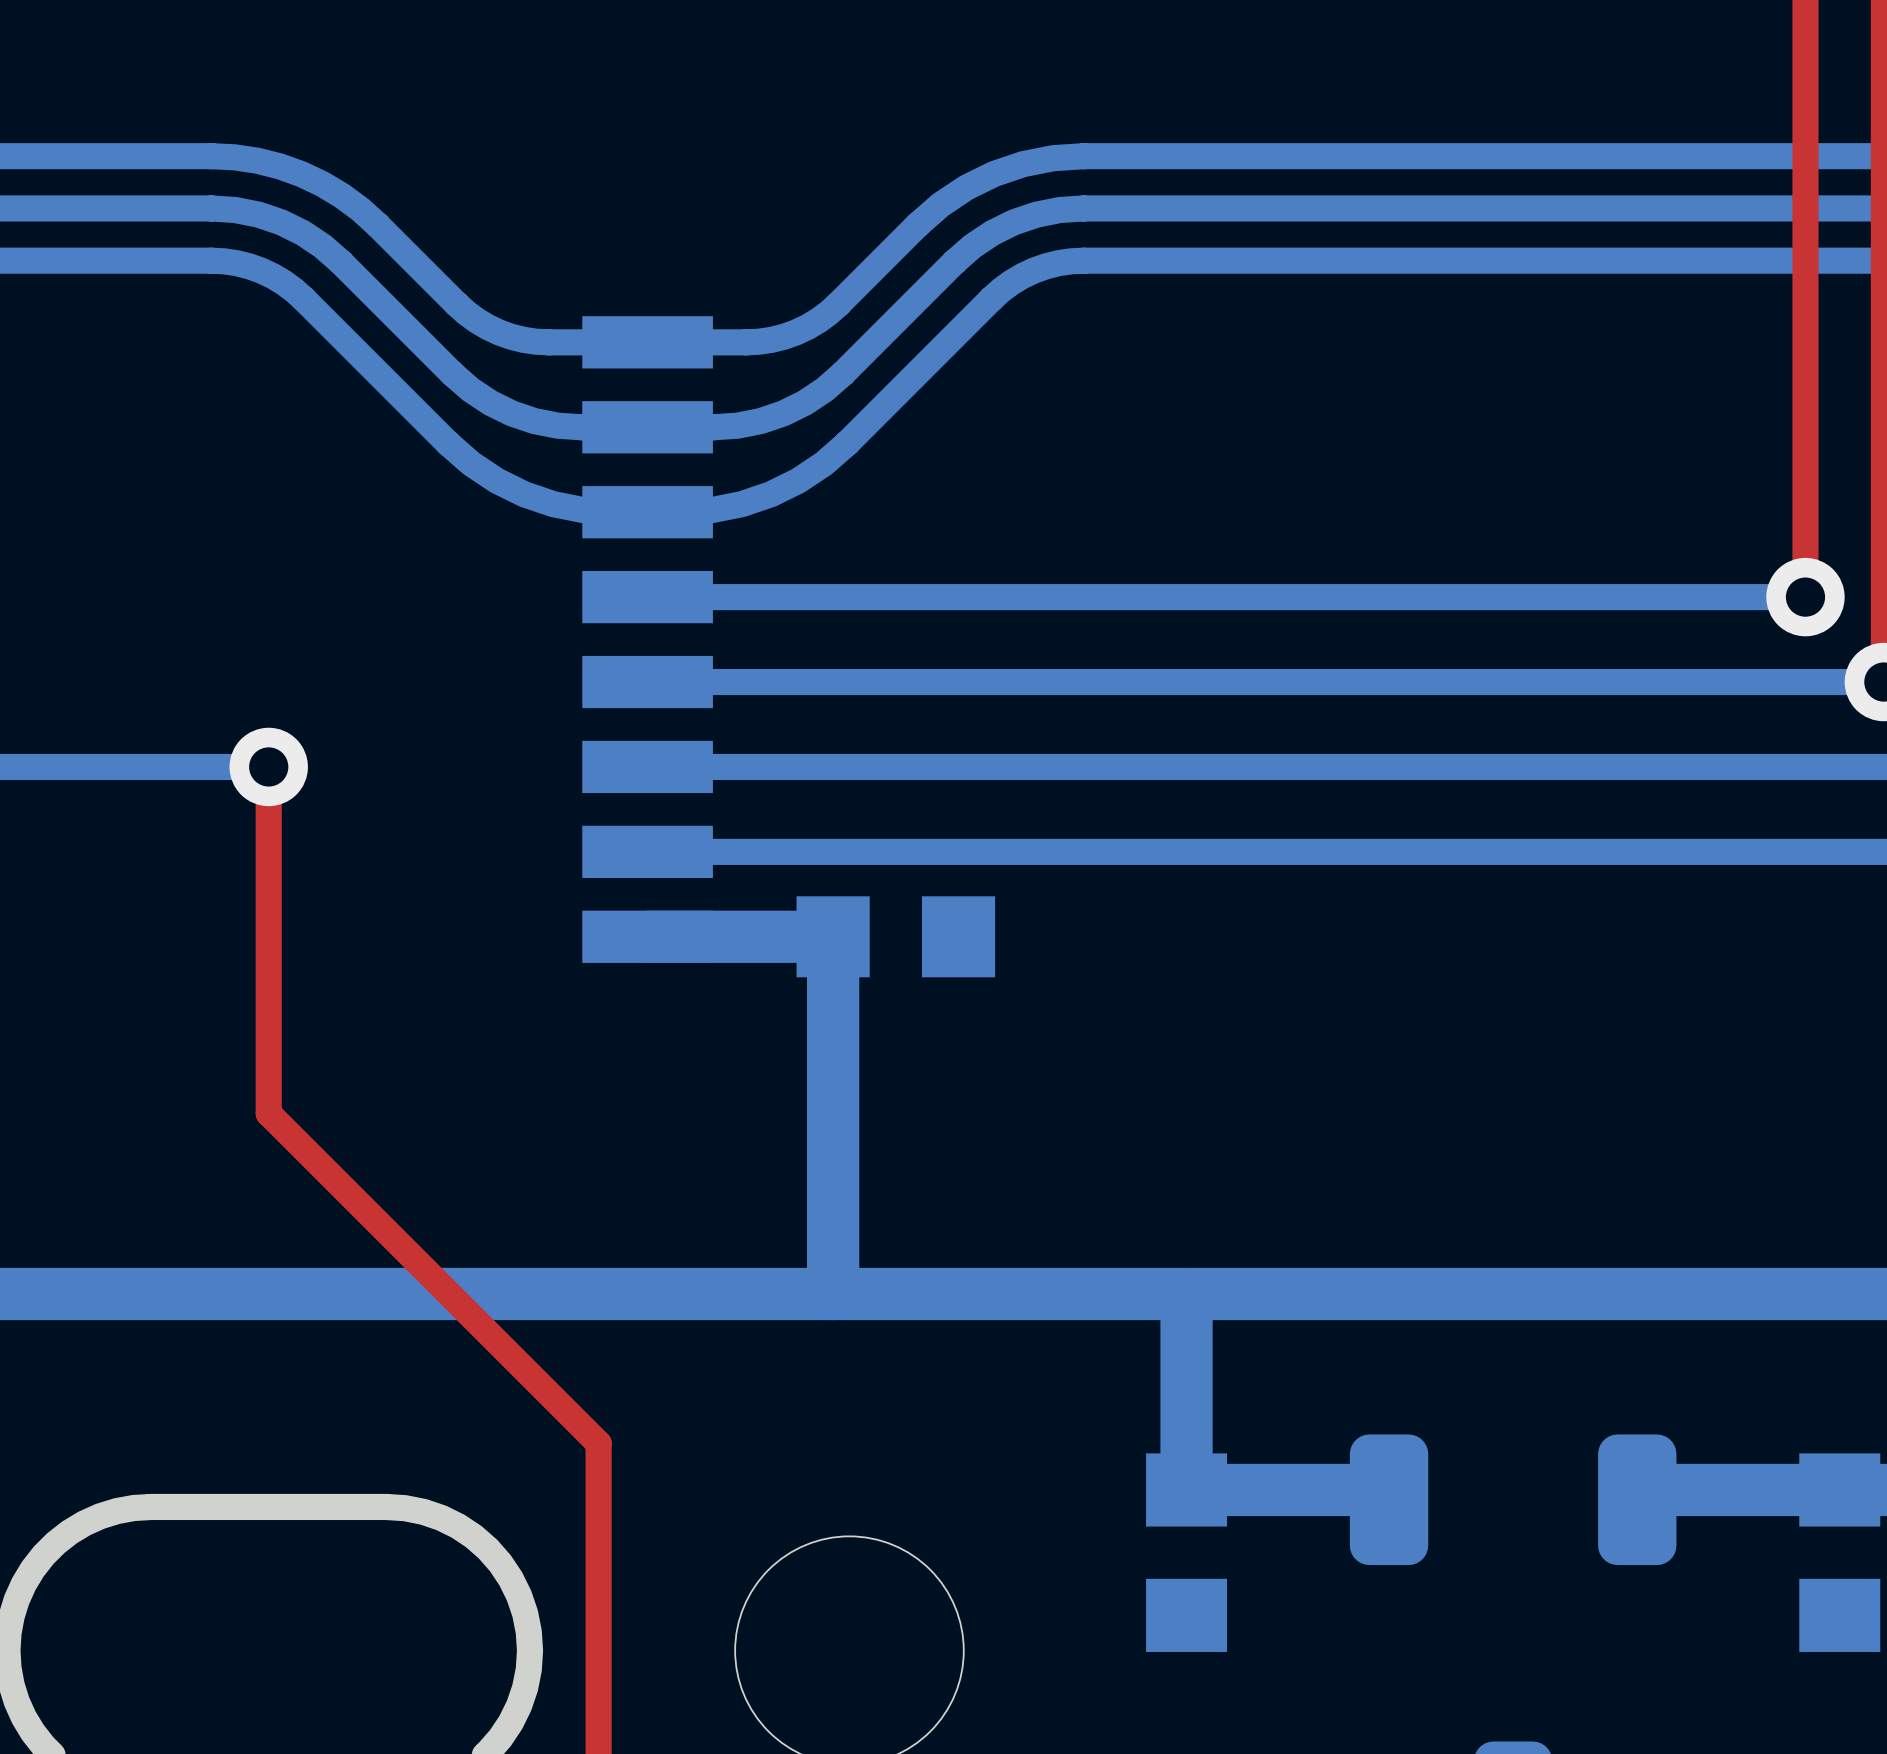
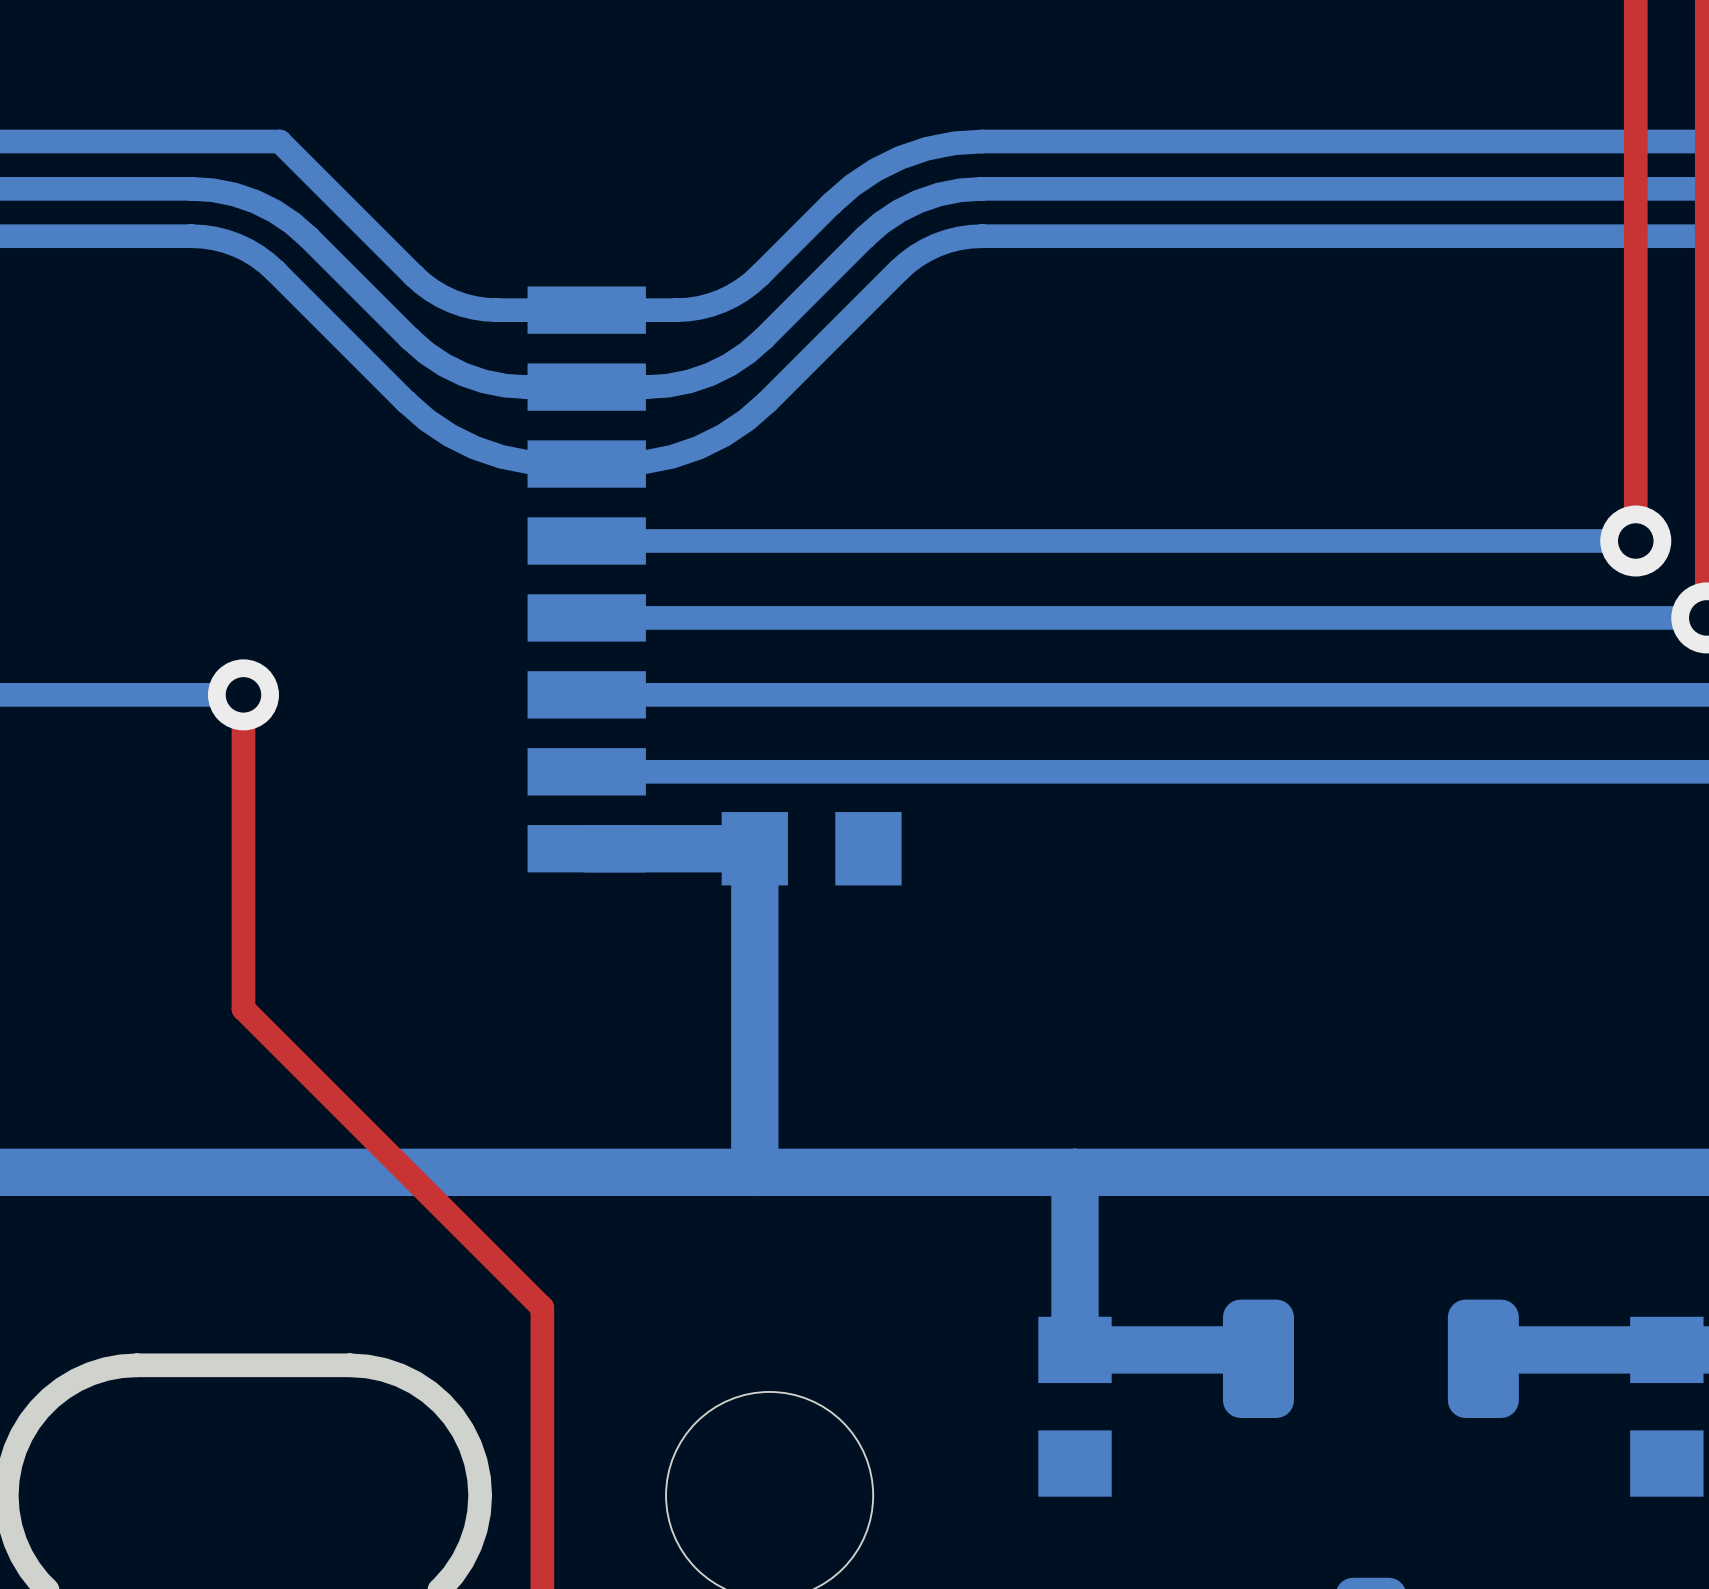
bottom track: (211, 156) (257, 160) (301, 174) (342, 195) (377, 225) -> (191, 141) (279, 141) (342, 203)

